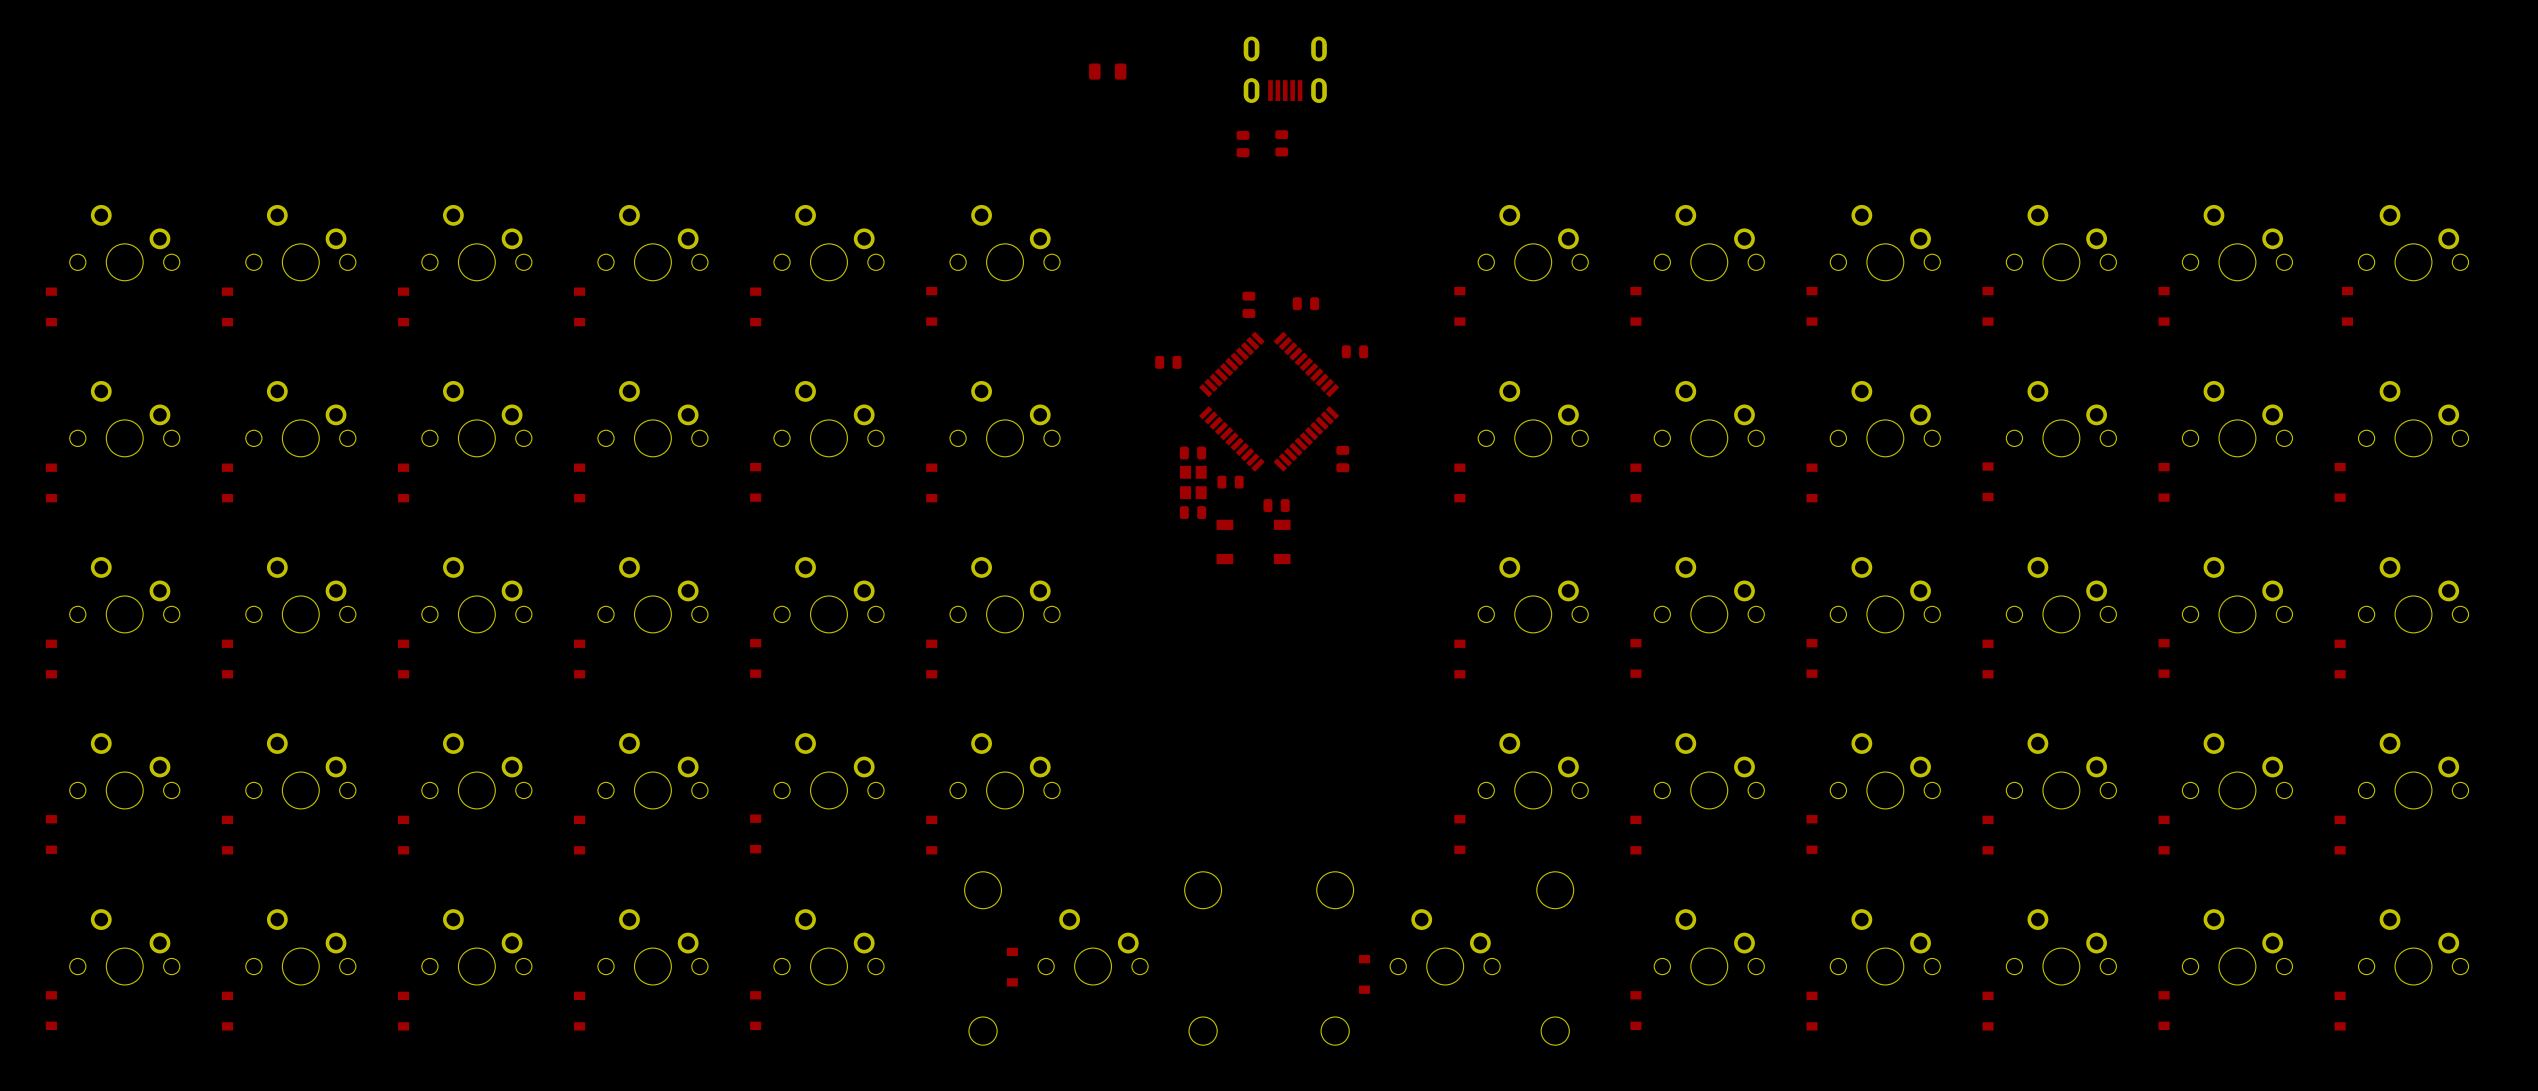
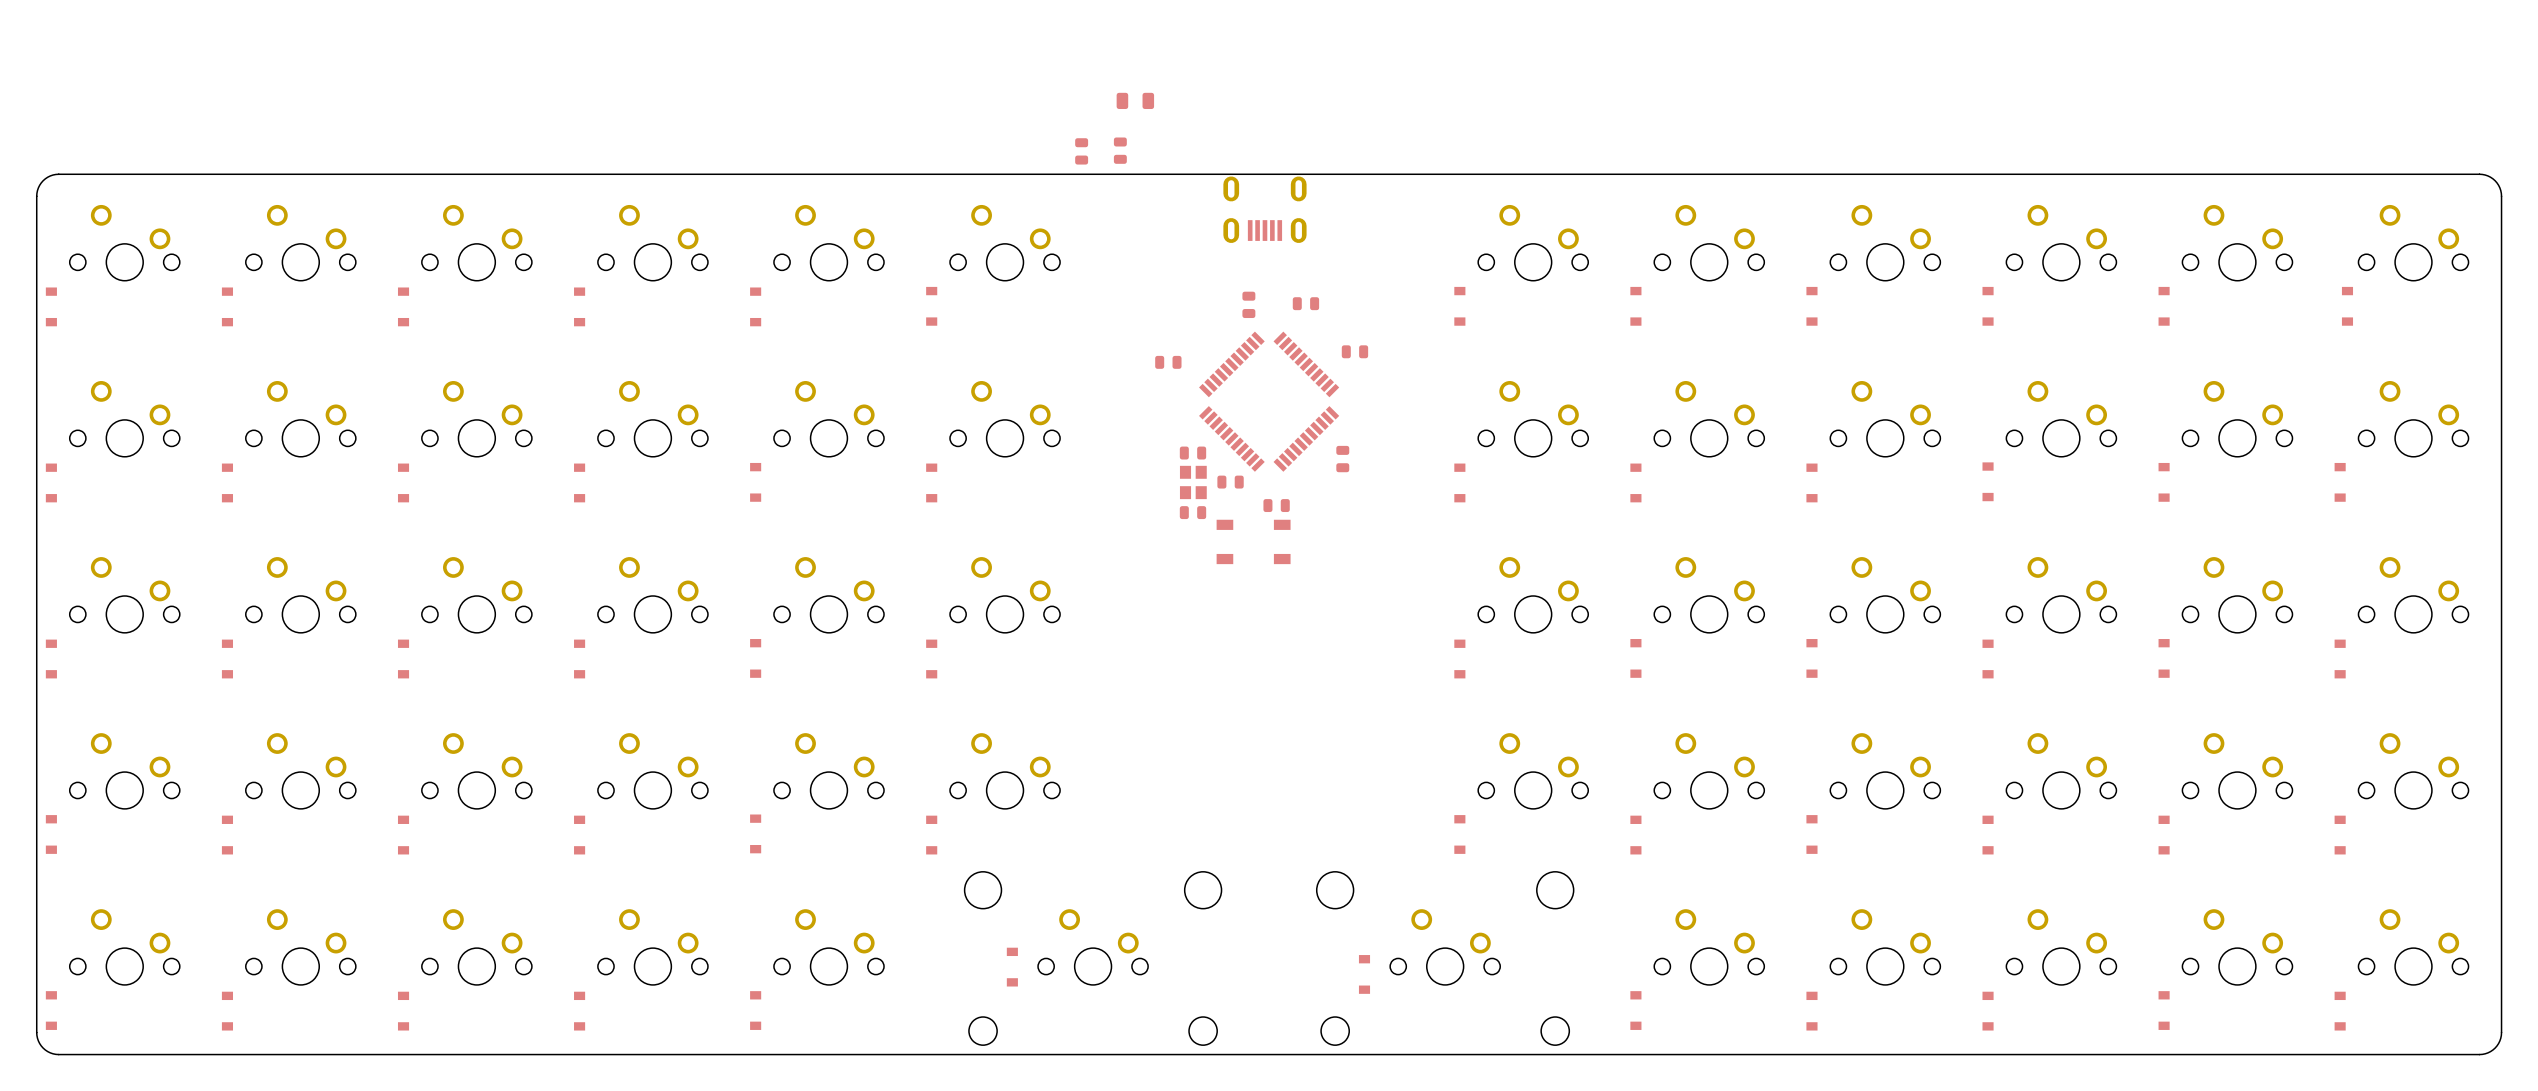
part position: (1285, 69) -> (1264, 209)
part position: (1107, 71) -> (1135, 100)
part: (1281, 143) -> none
part: (1243, 144) -> none
part: none -> (1120, 150)
part: none -> (1081, 151)
board edge: none -> (2479, 174) (58, 174) (50, 175) (39, 185) (36, 196) (36, 1032) (38, 1040) (47, 1051) (58, 1054) (2479, 1054) (2487, 1052) (2498, 1043) (2501, 1032) (2501, 196) (2499, 187) (2495, 180) (2487, 175) (2479, 174)

